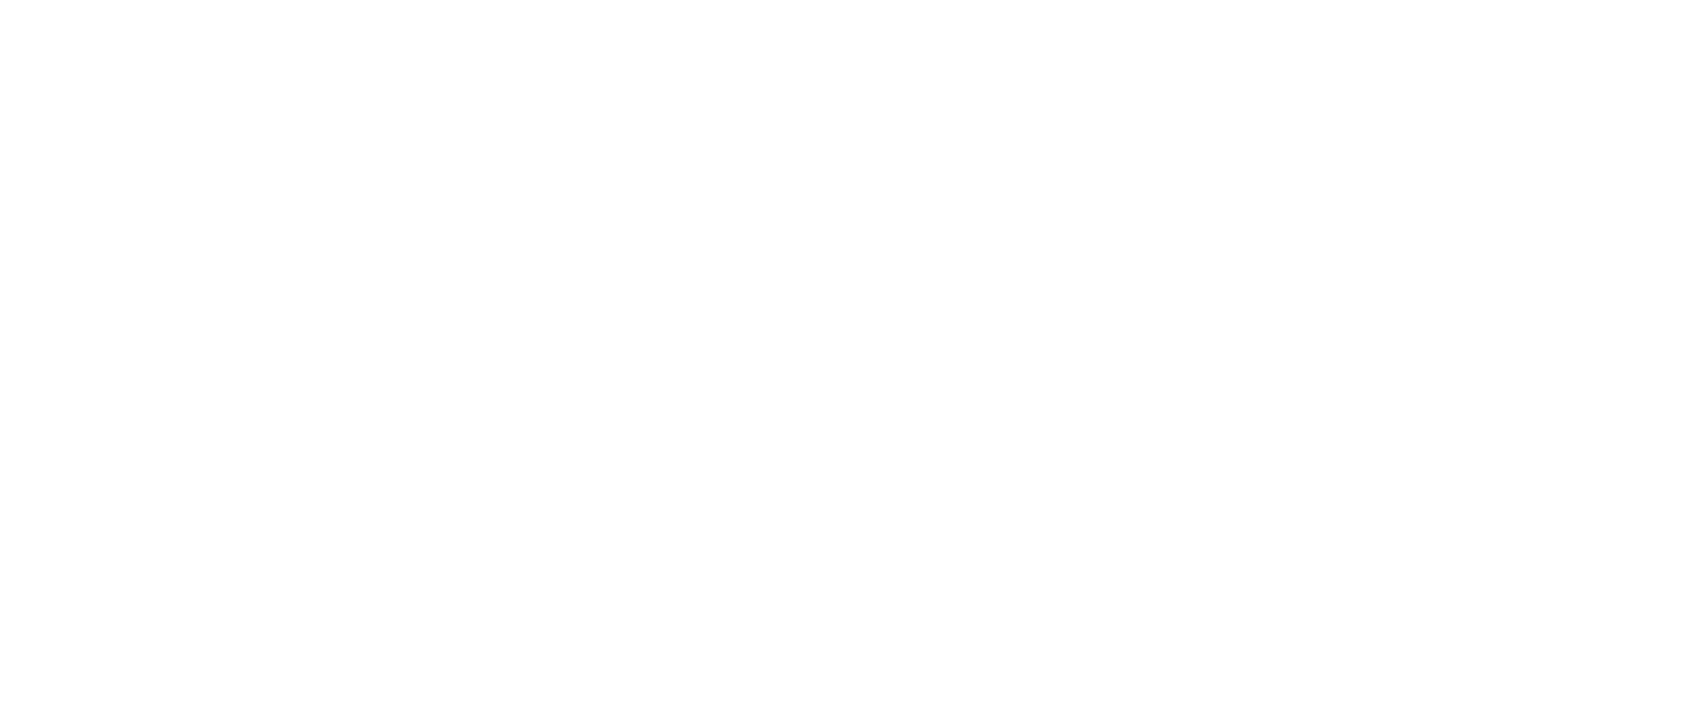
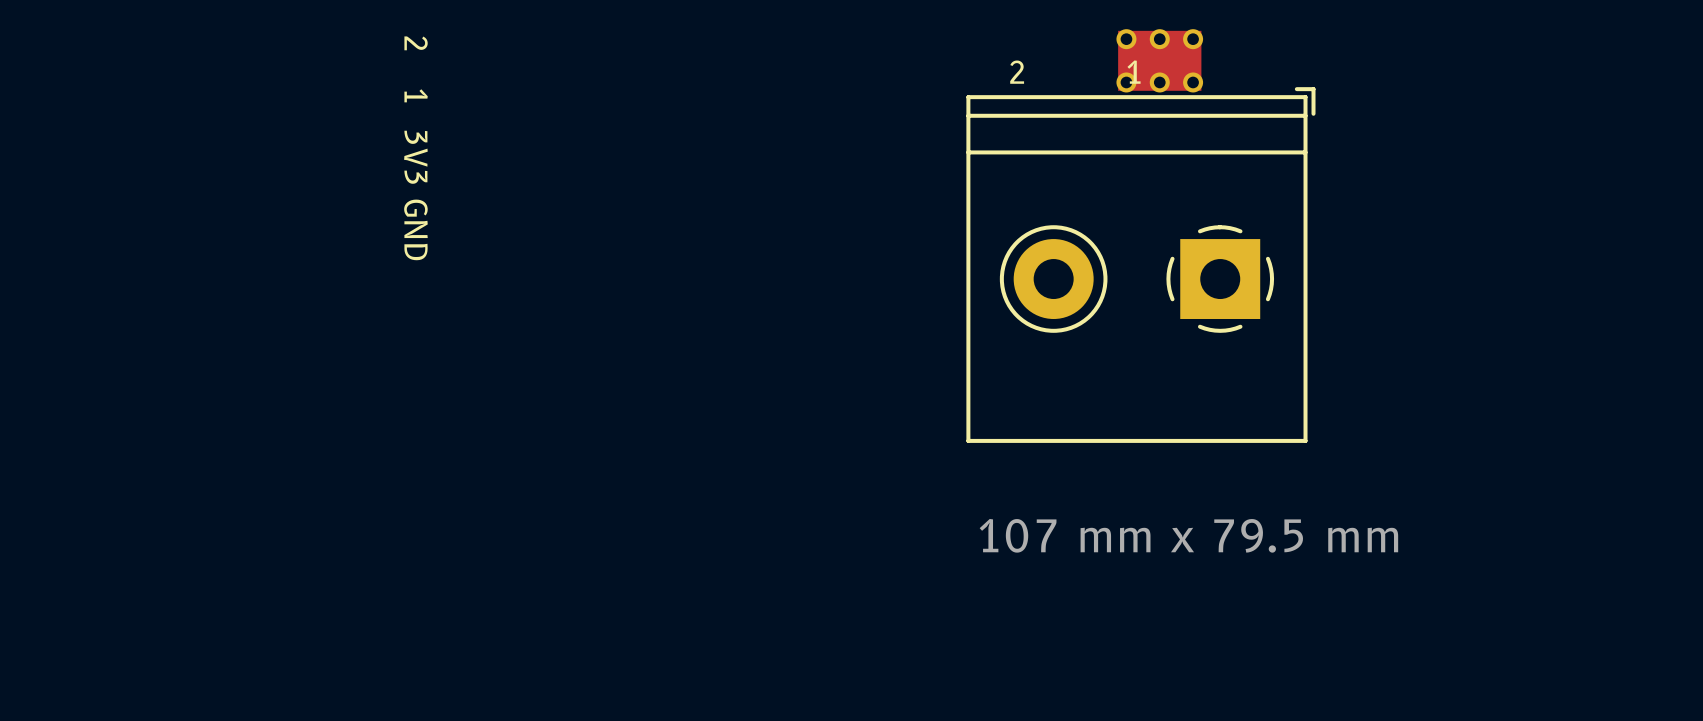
part: none -> (1159, 60)
text: none -> 2 1 (1075, 72)
text: none -> 2 1 3V3 GND (415, 148)
part: none -> (1140, 265)
text: none -> 107 mm x 79.5 mm (1188, 535)

